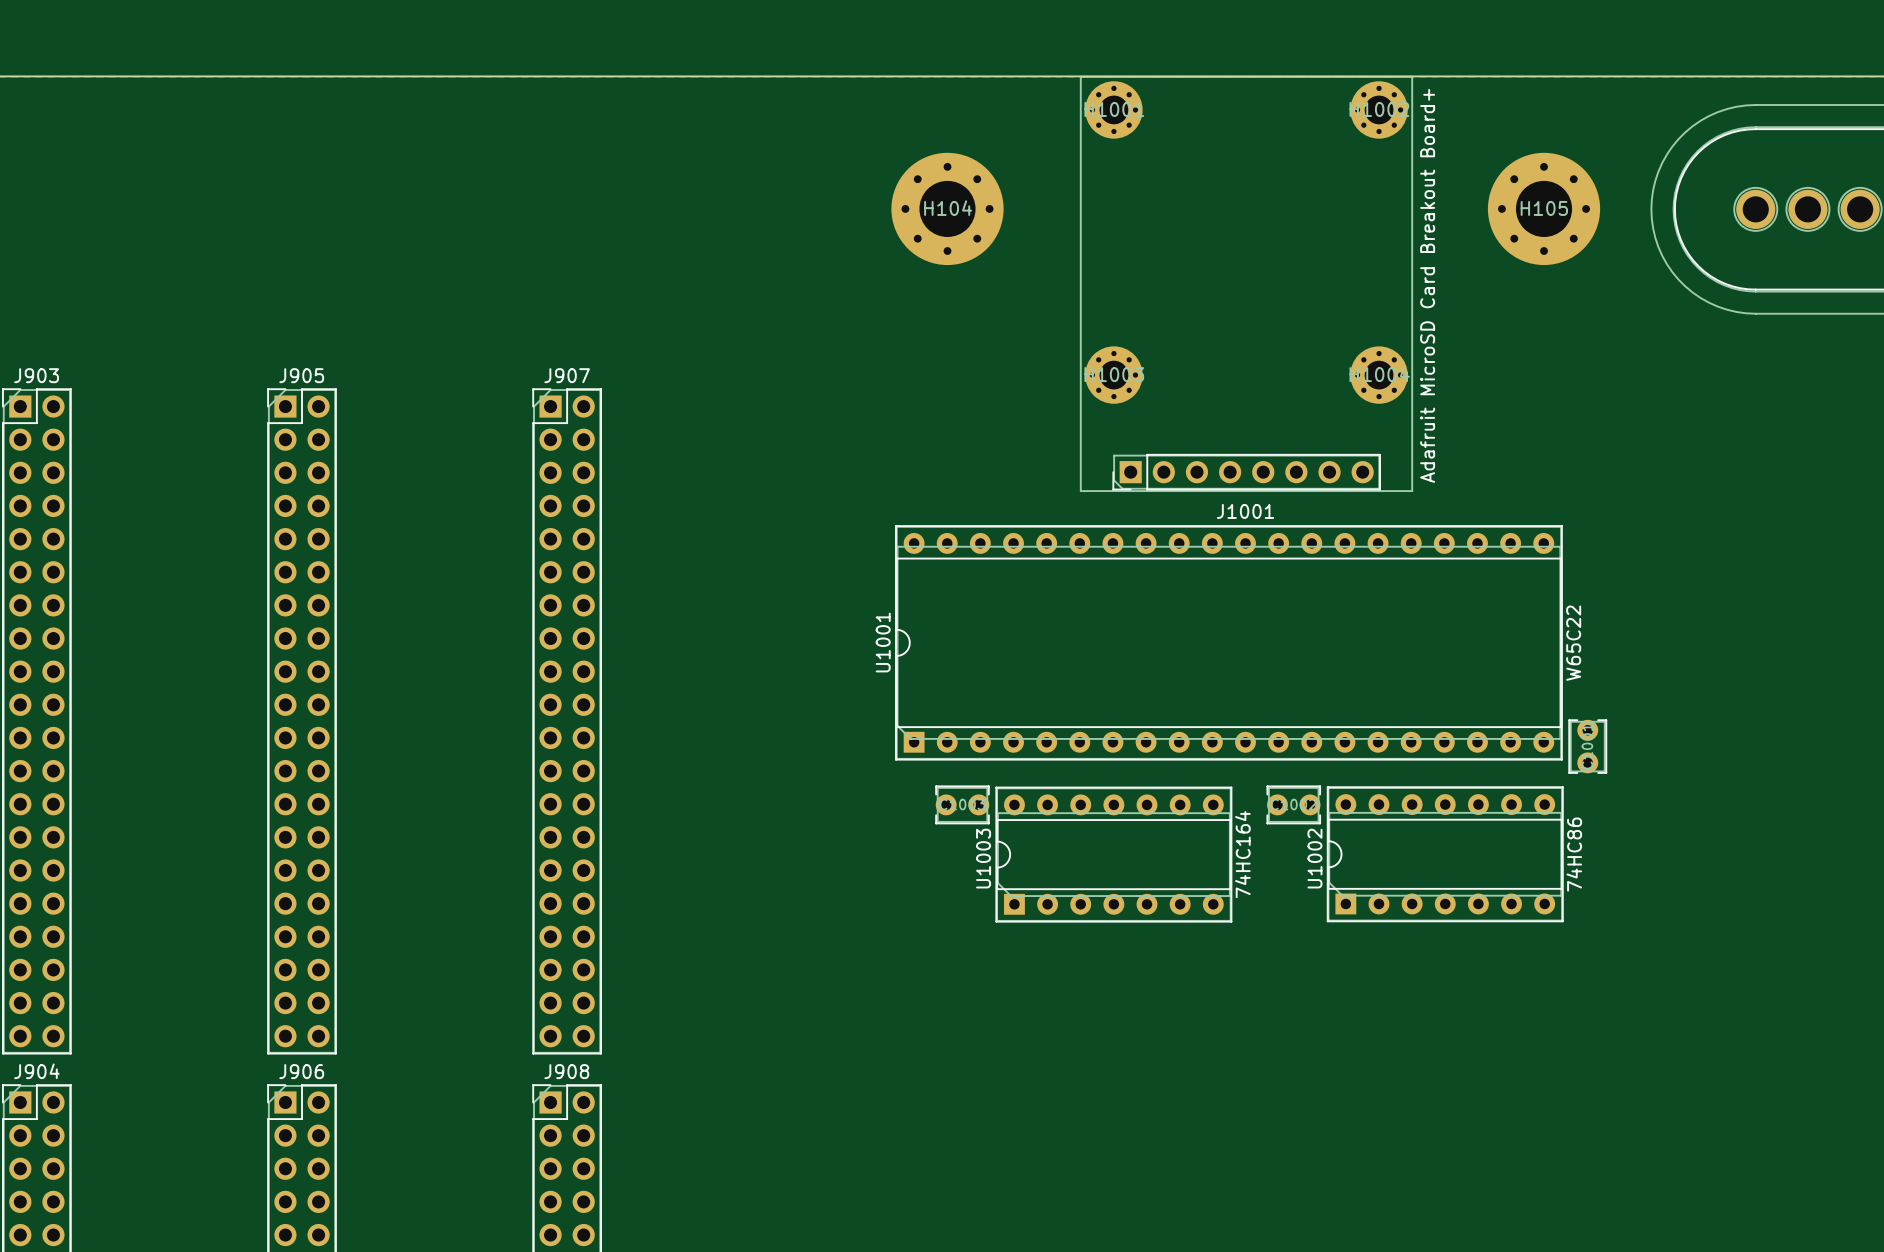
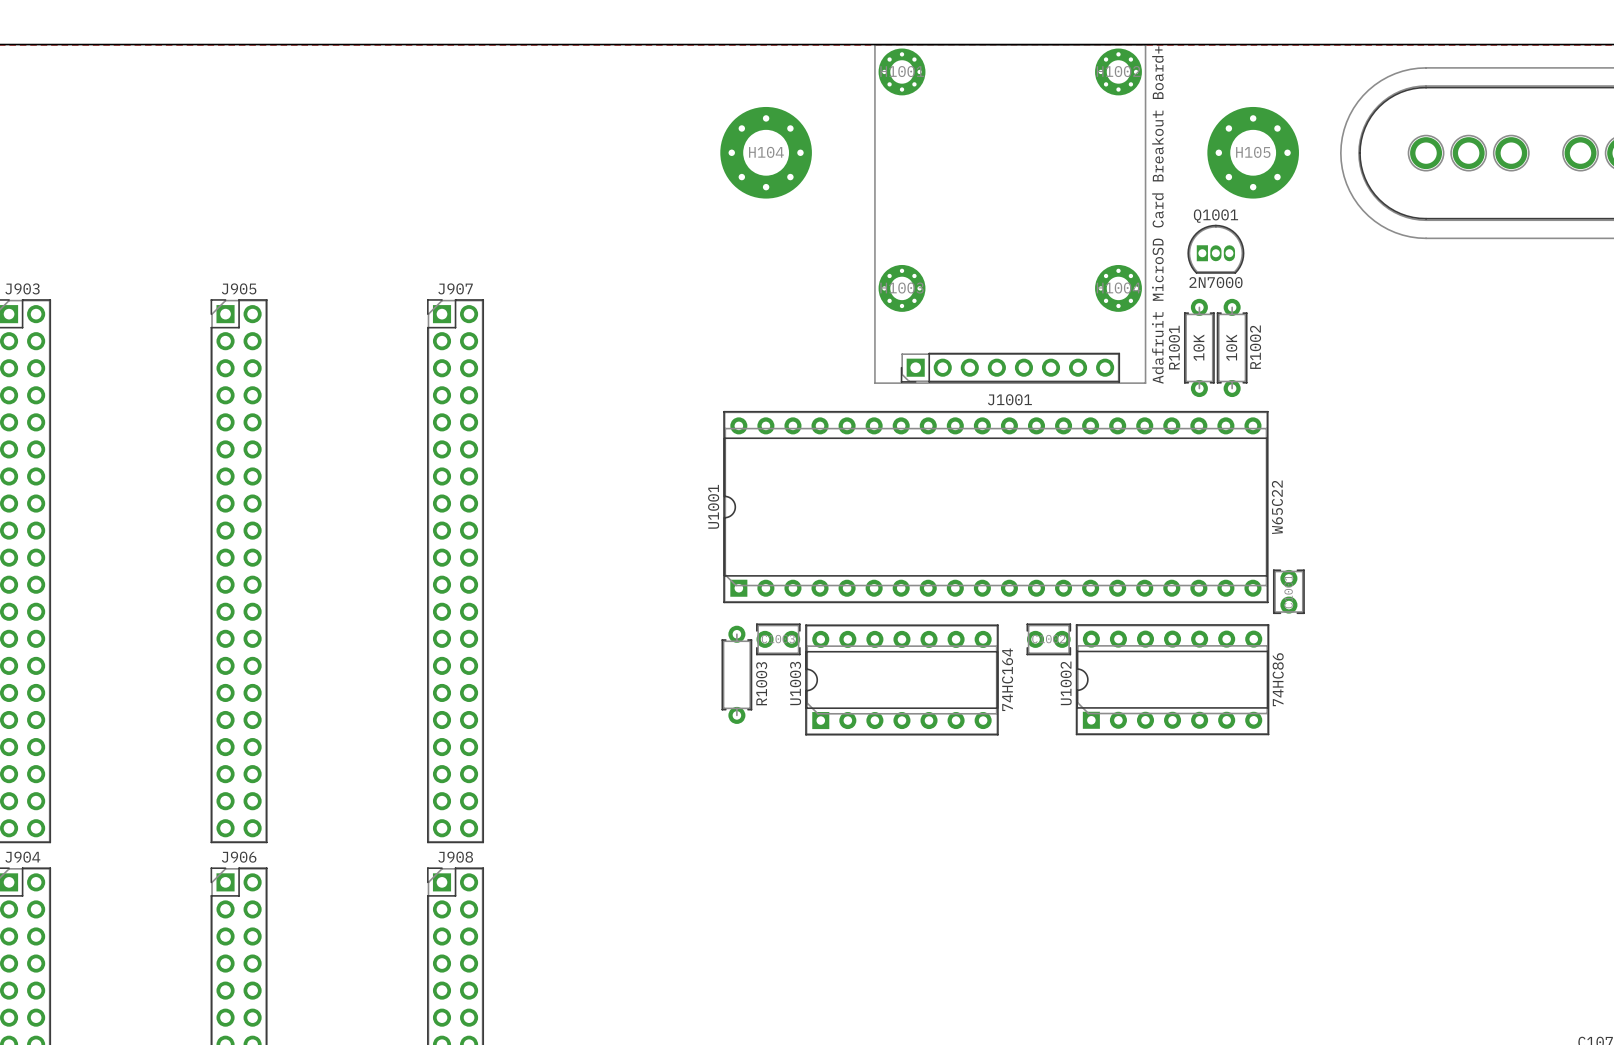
Q1001: none -> 2N7000 (1215, 249)
R1001: none -> 10K (1199, 347)
R1002: none -> 10K (1232, 347)
R1003: none -> (736, 674)

